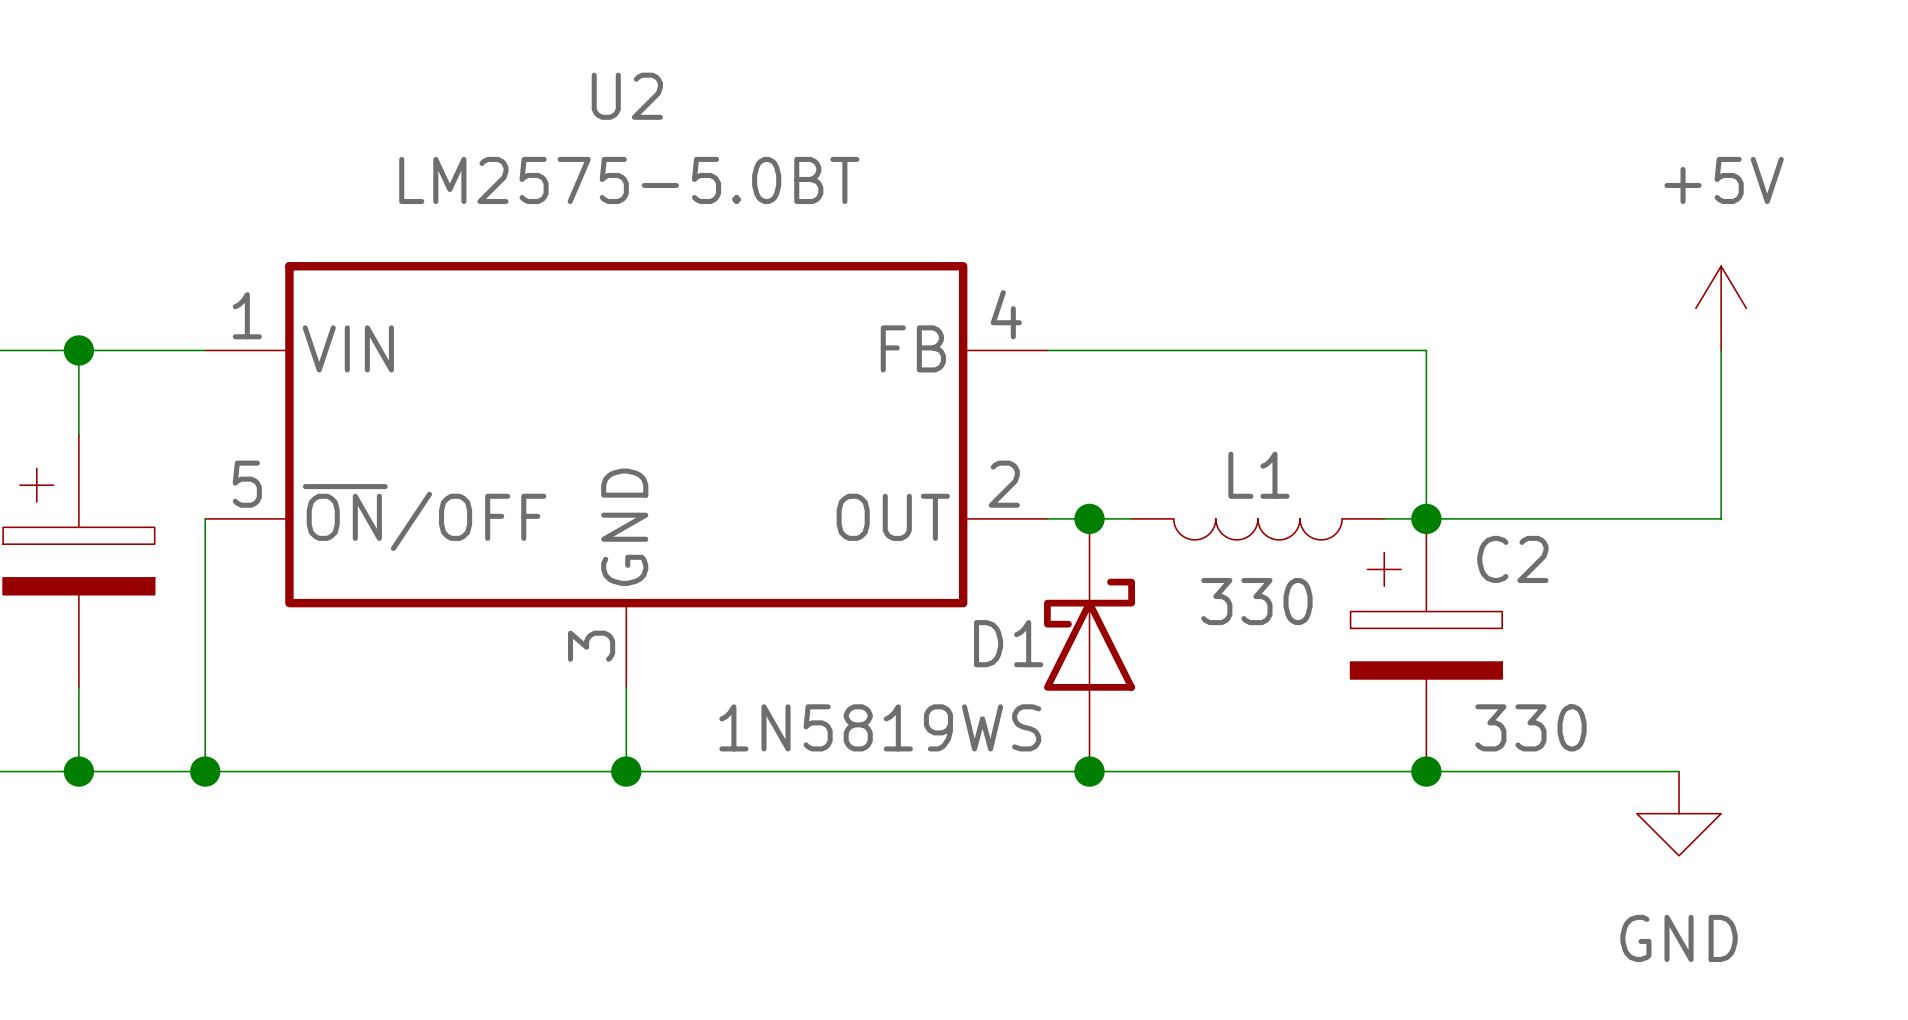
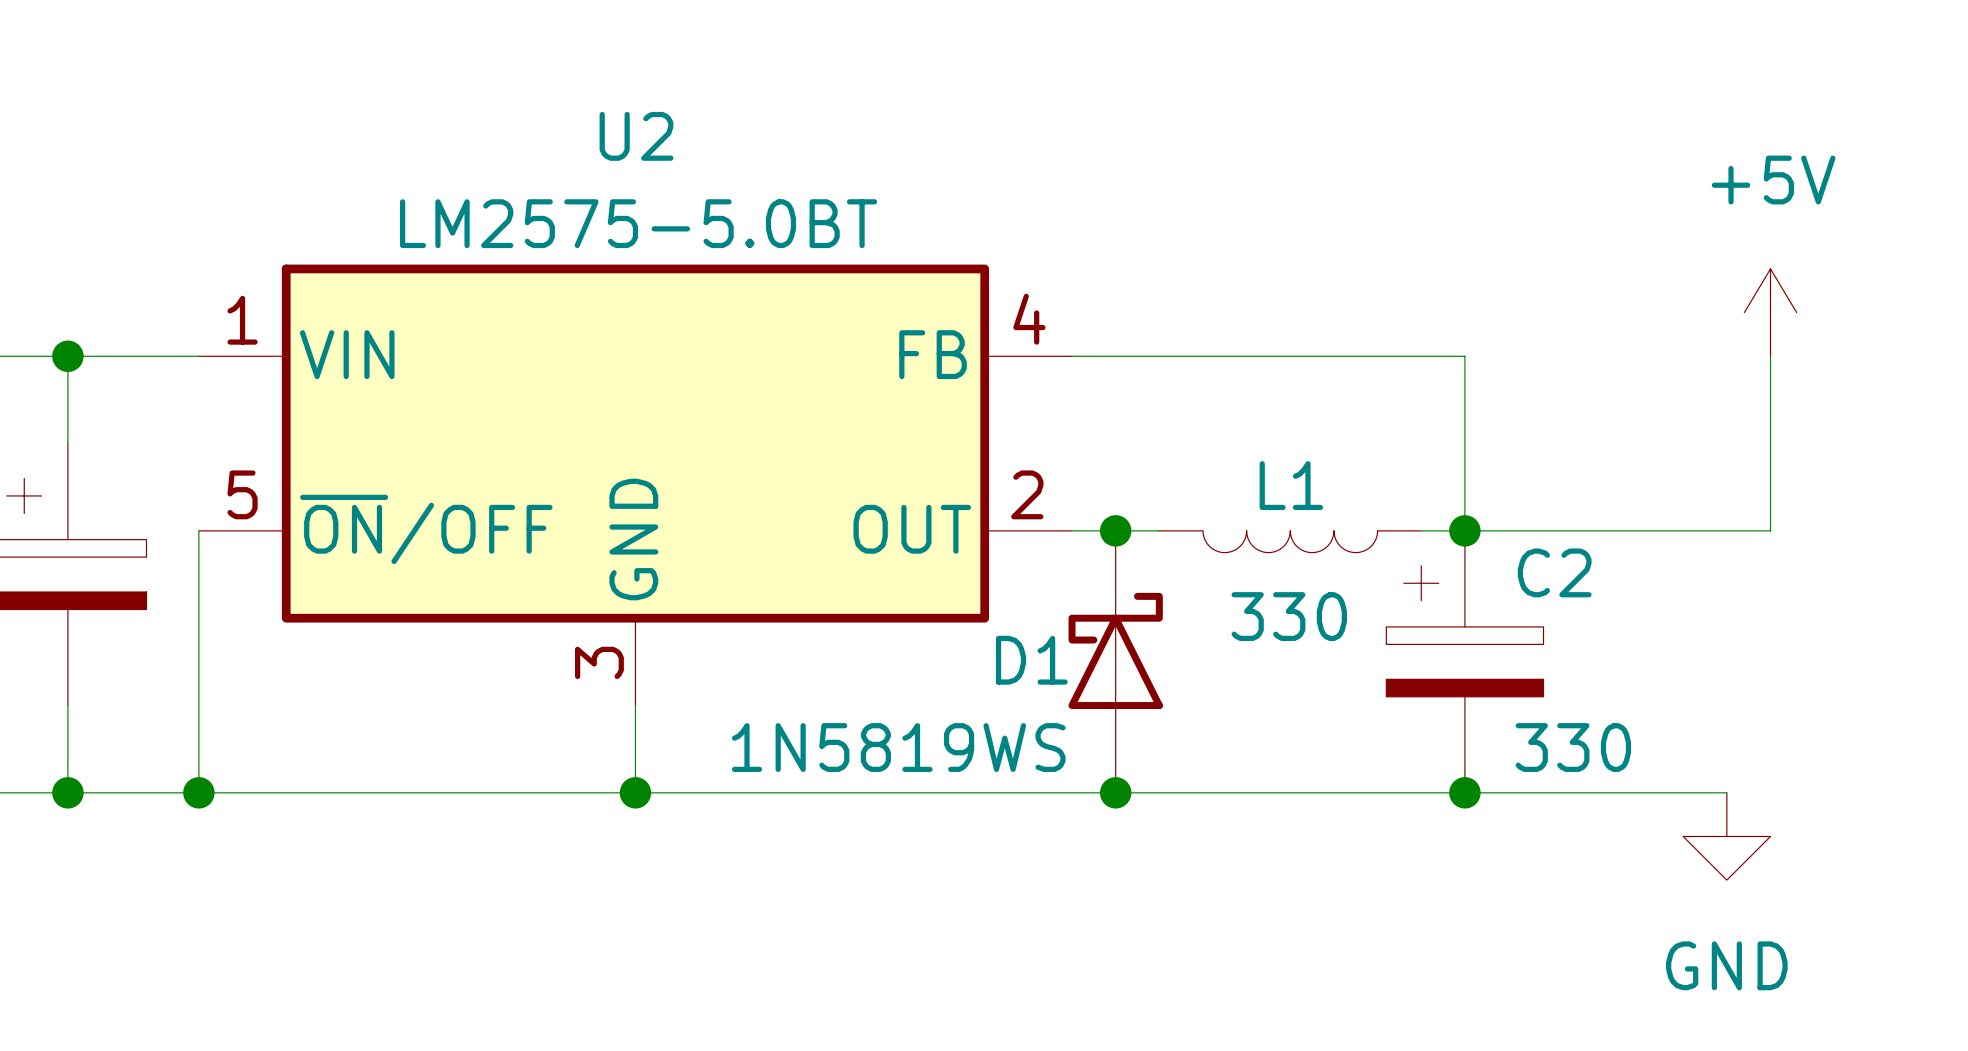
U2 name position: U2 (627, 96) -> U2 (636, 136)
U2 value position: LM2575-5.0BT (629, 180) -> LM2575-5.0BT (638, 223)

